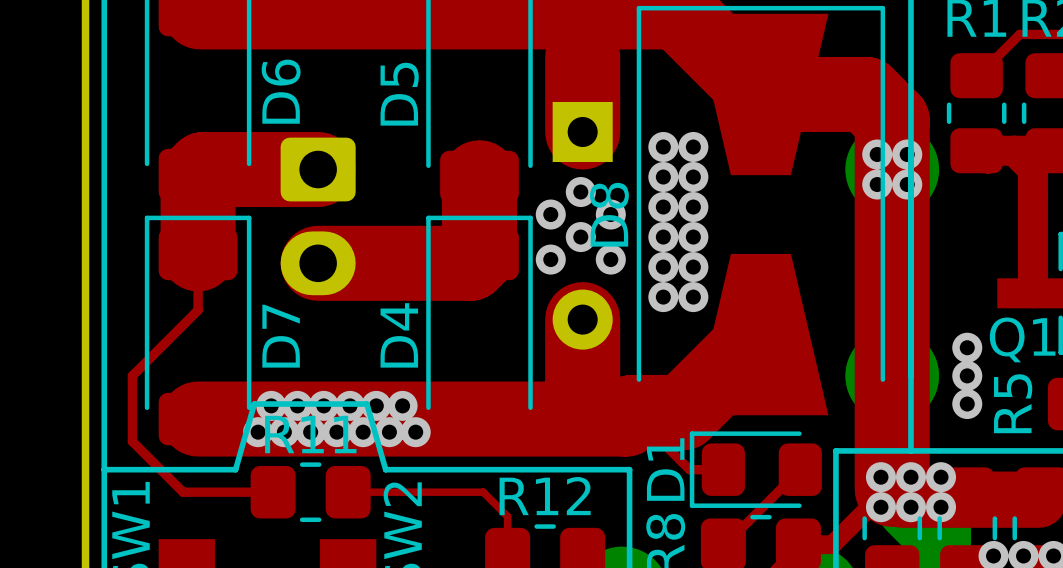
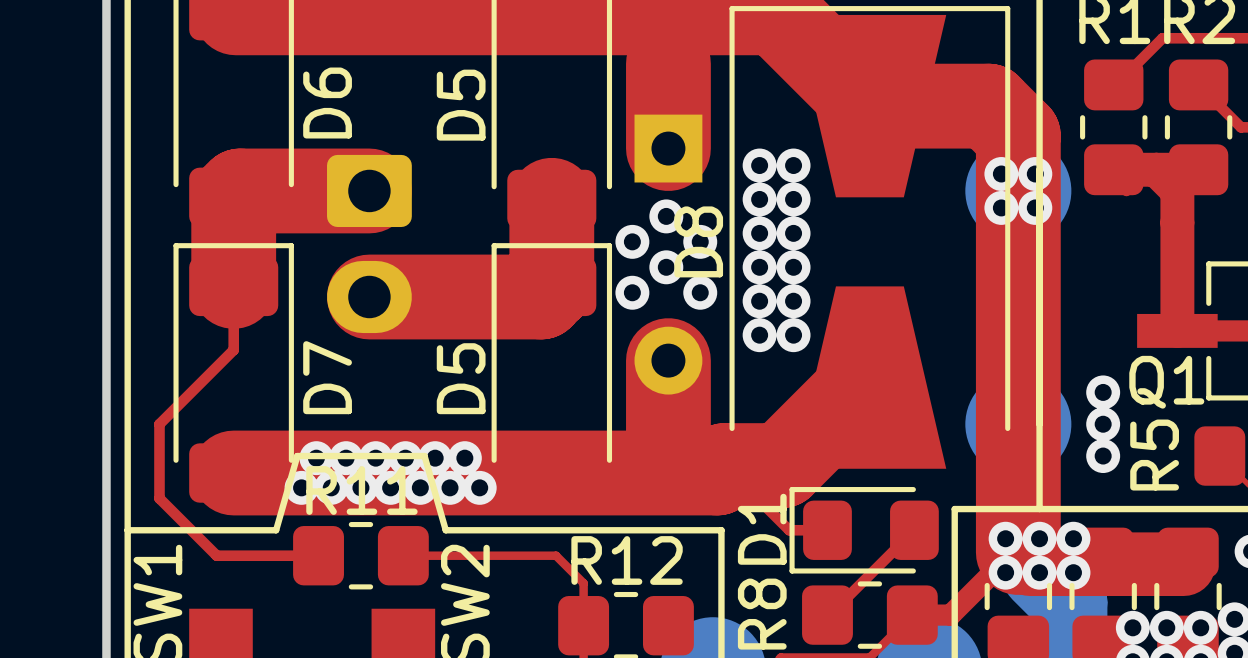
D4 name: D4 (399, 335) -> D5 (461, 378)

